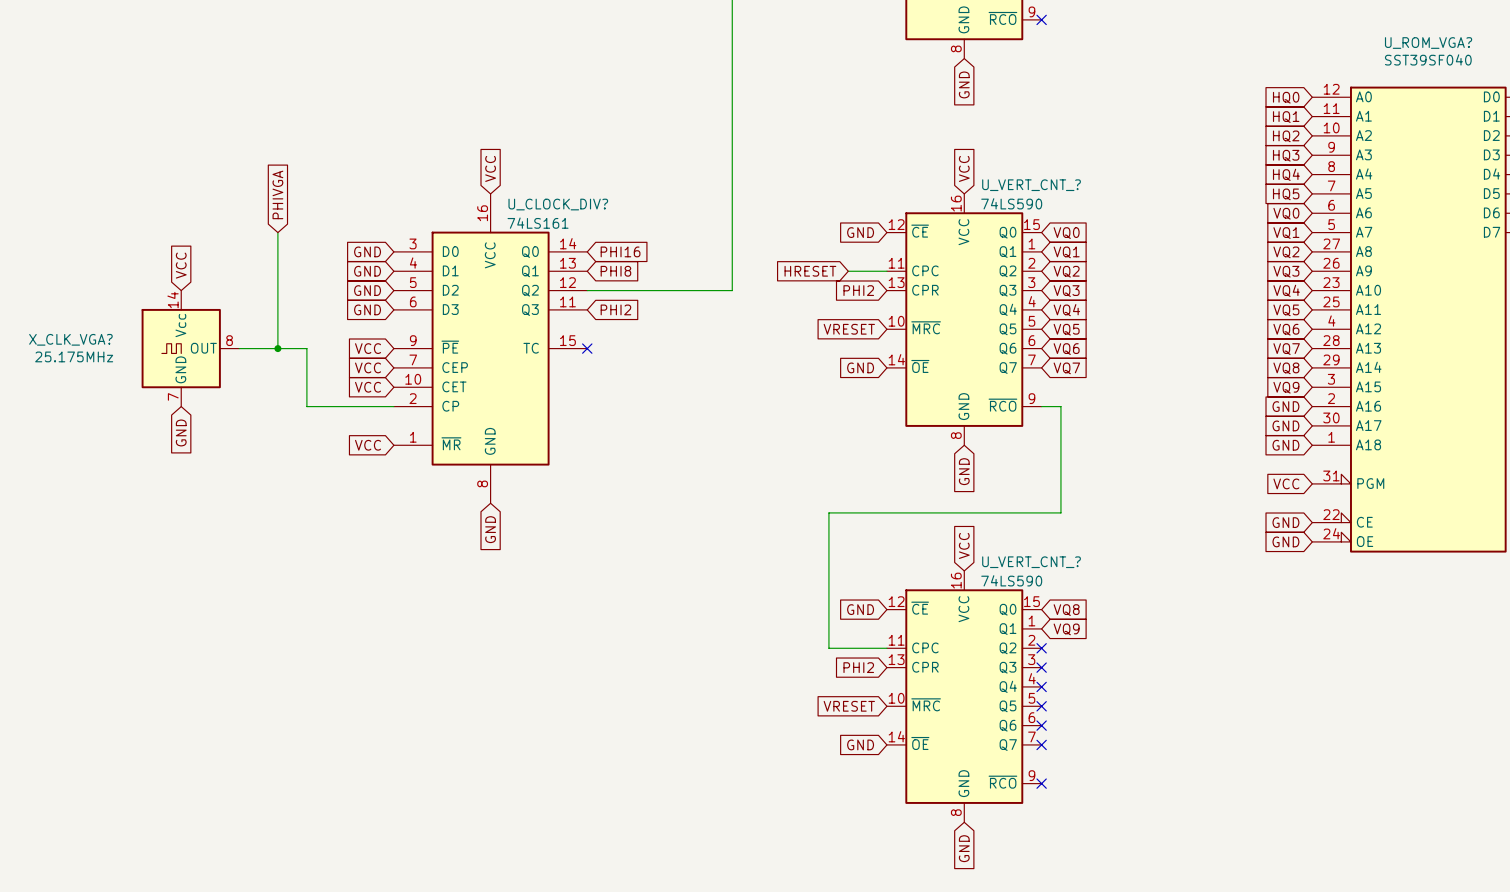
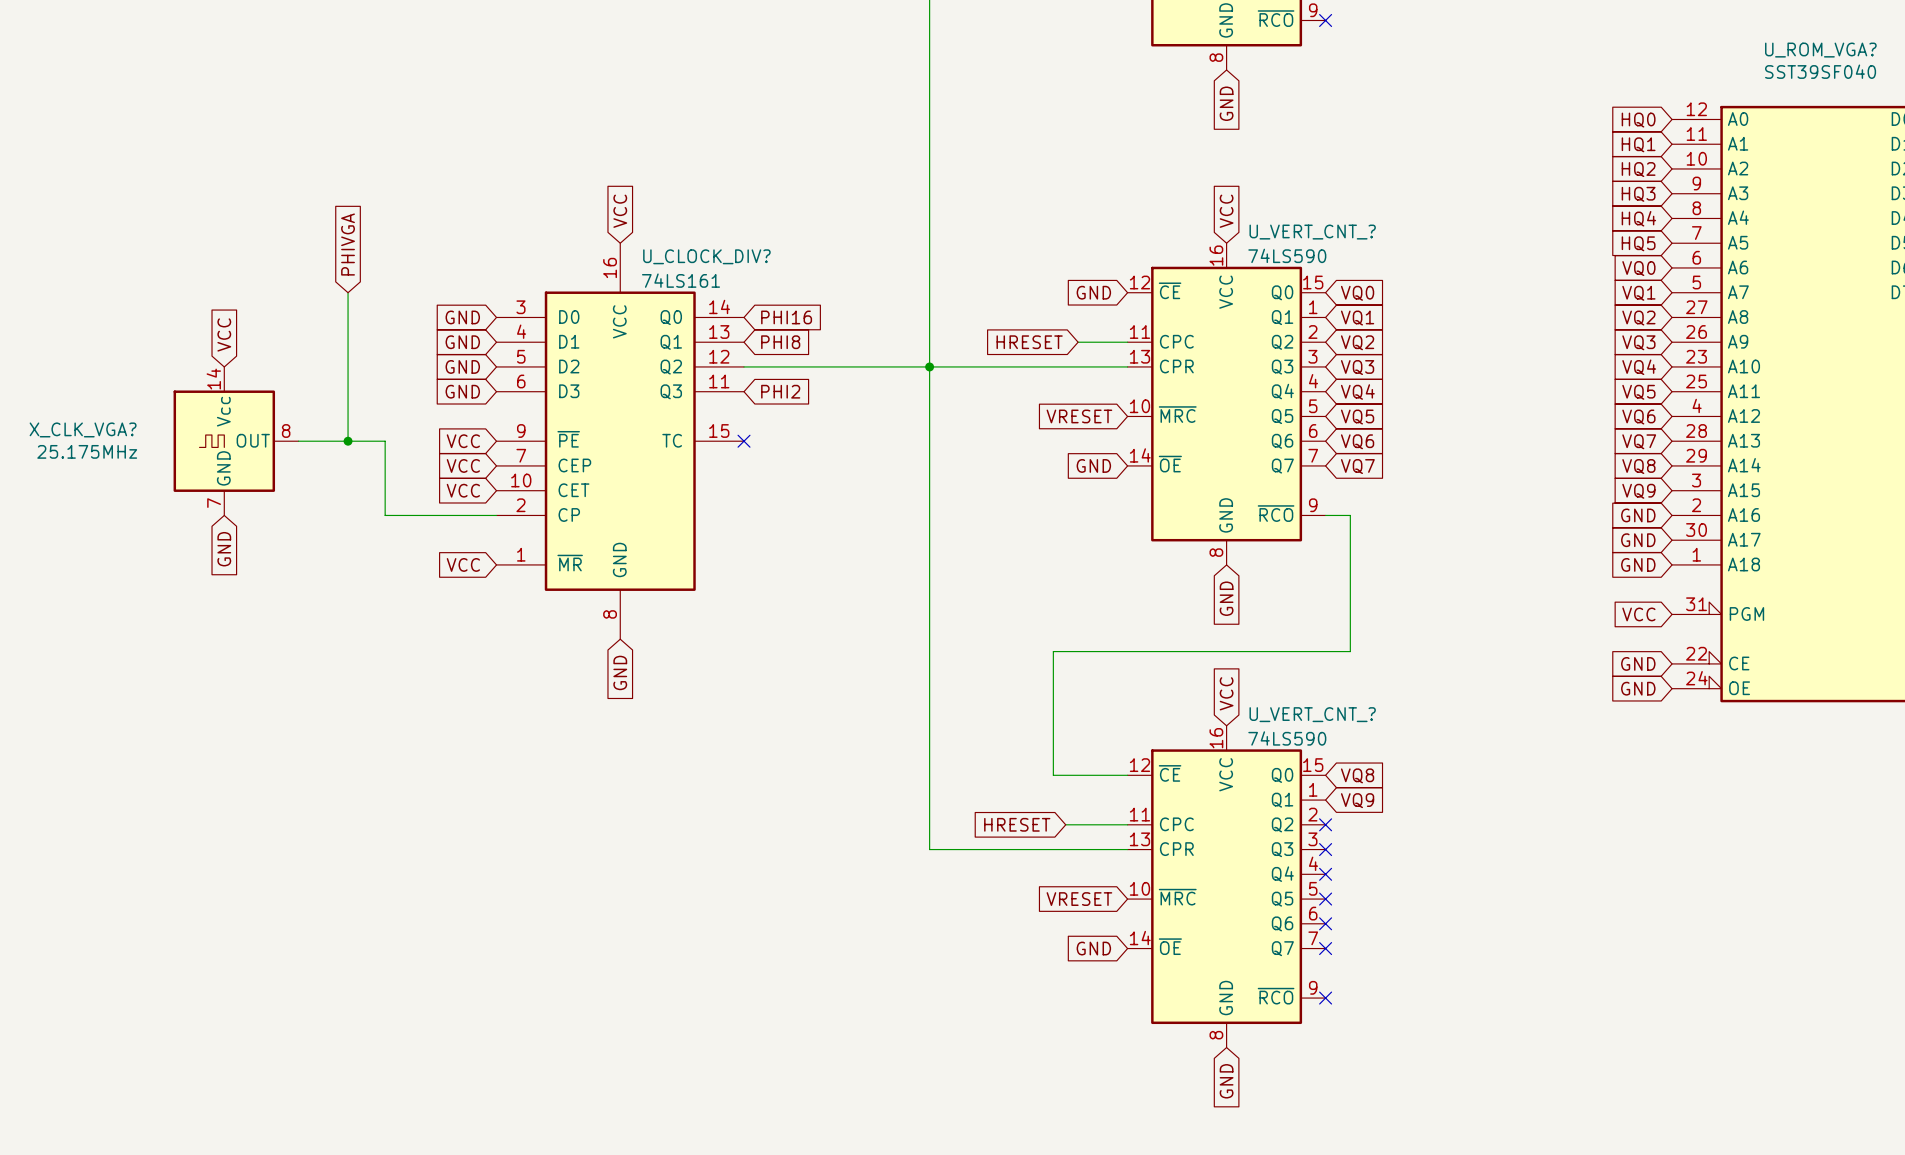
junction: none -> (929, 366)
global label: PHI2 (858, 290) -> none
wire: none -> (1127, 366) (929, 366) (929, 849) (1127, 849)
wire: (828, 609) (828, 648) (838, 648) -> (1053, 775) (1127, 775)
global label: GND (860, 609) -> none
global label: none -> HRESET (1017, 824)
global label: PHI2 (858, 667) -> none

